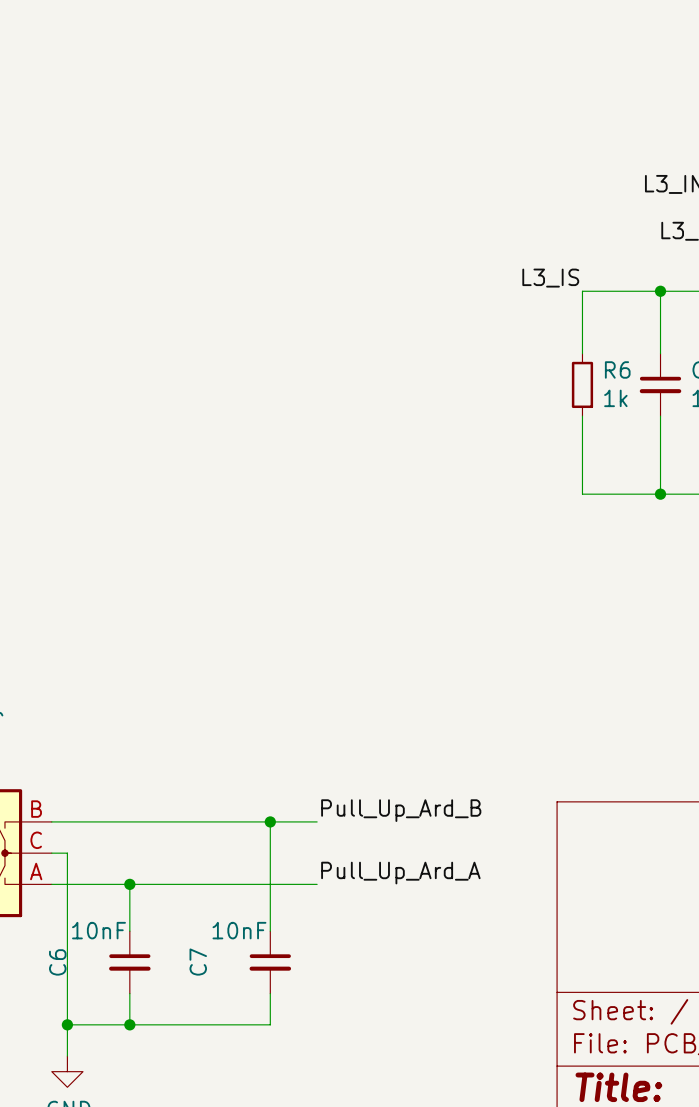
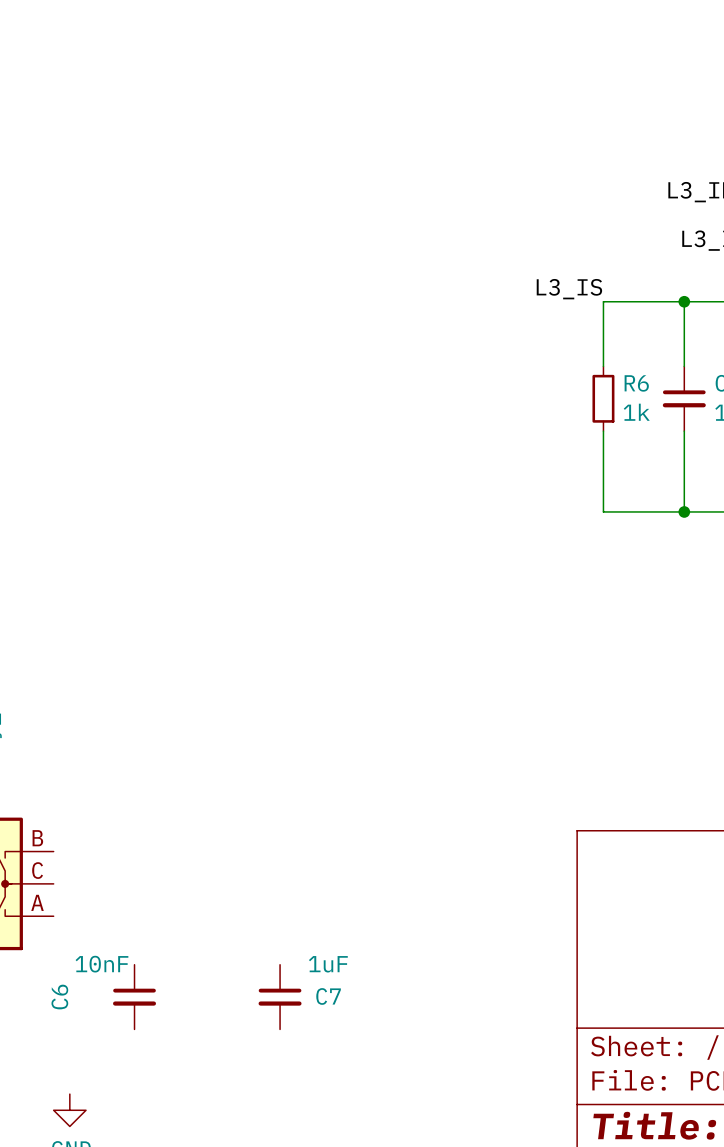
label: Pull_Up_Ard_B (401, 810) -> none
wire: (51, 821) (317, 821) -> none
wire: (270, 821) (270, 931) -> none
junction: (270, 821) -> none
wire: (51, 853) (67, 853) (67, 1056) -> none
label: Pull_Up_Ard_A (400, 873) -> none
wire: (51, 884) (317, 884) -> none
wire: (129, 884) (129, 931) -> none
junction: (129, 884) -> none
C7 value: 10nF (239, 930) -> 1uF (328, 964)
C7 name rotation: 0° (198, 962) -> 90° clockwise (328, 996)
C7 name position: C7 (198, 962) -> C7 (328, 996)
wire: (129, 993) (129, 1024) -> none
wire: (270, 993) (270, 1024) (67, 1024) -> none
junction: (67, 1024) -> none
junction: (129, 1024) -> none

